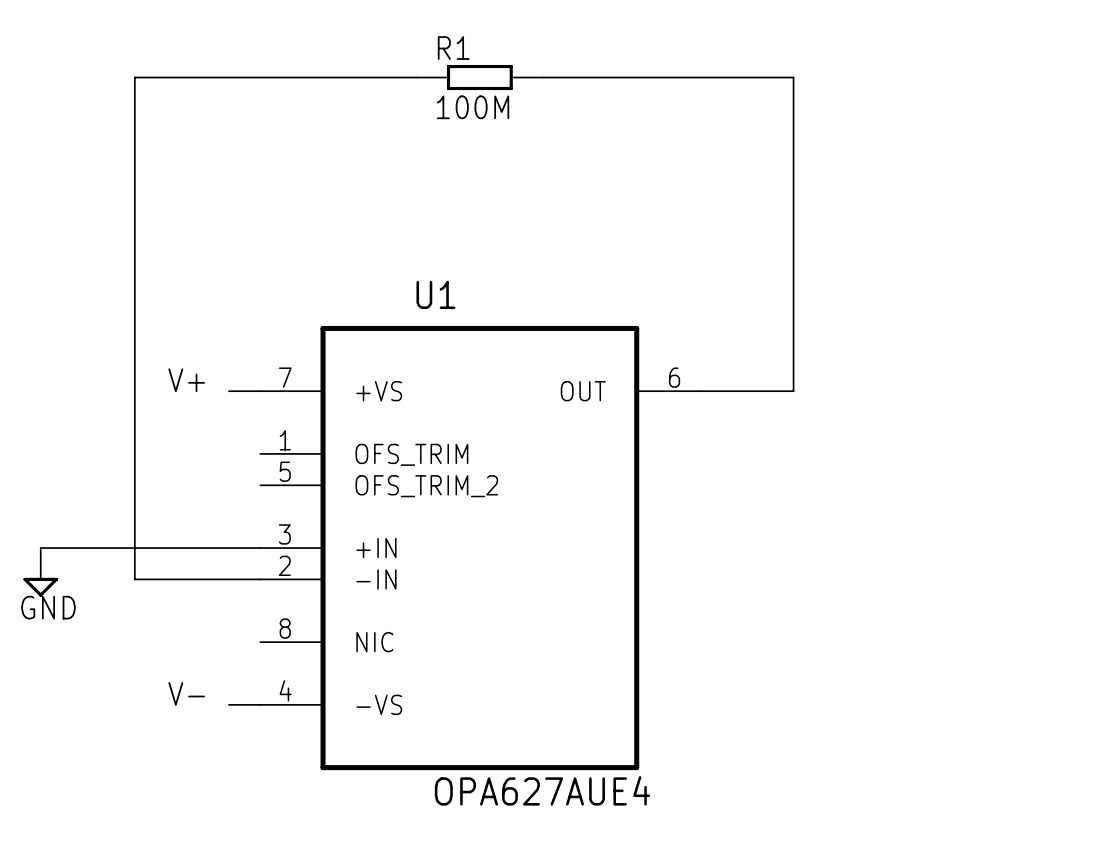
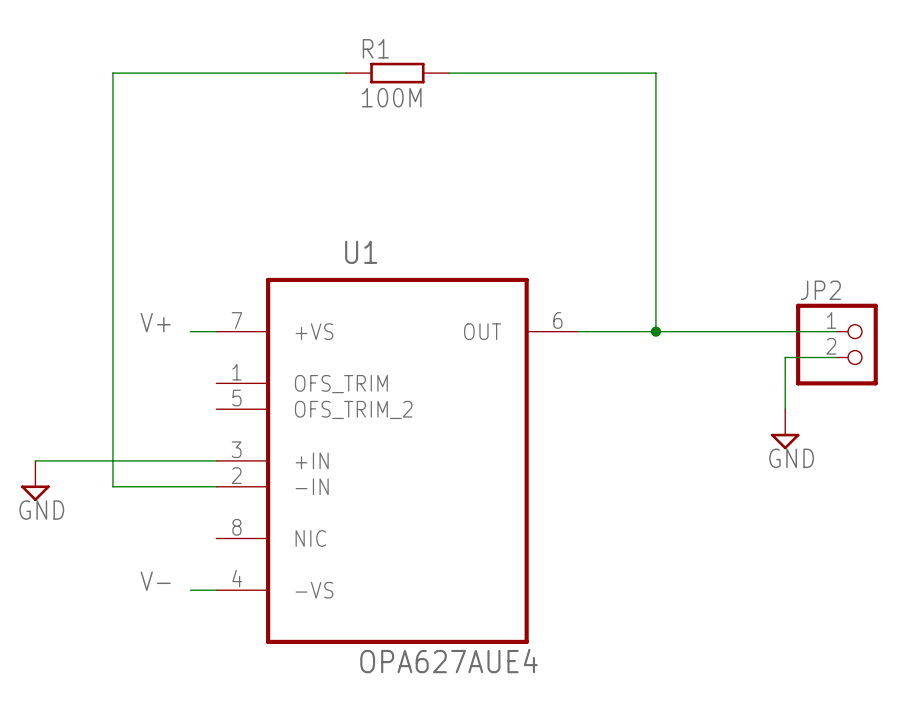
wire: none -> (655, 331) (836, 331)
junction: none -> (655, 331)
JP2: none -> (836, 344)
wire: none -> (836, 357) (785, 357) (785, 409)
power symbol: none -> GND (785, 429)

